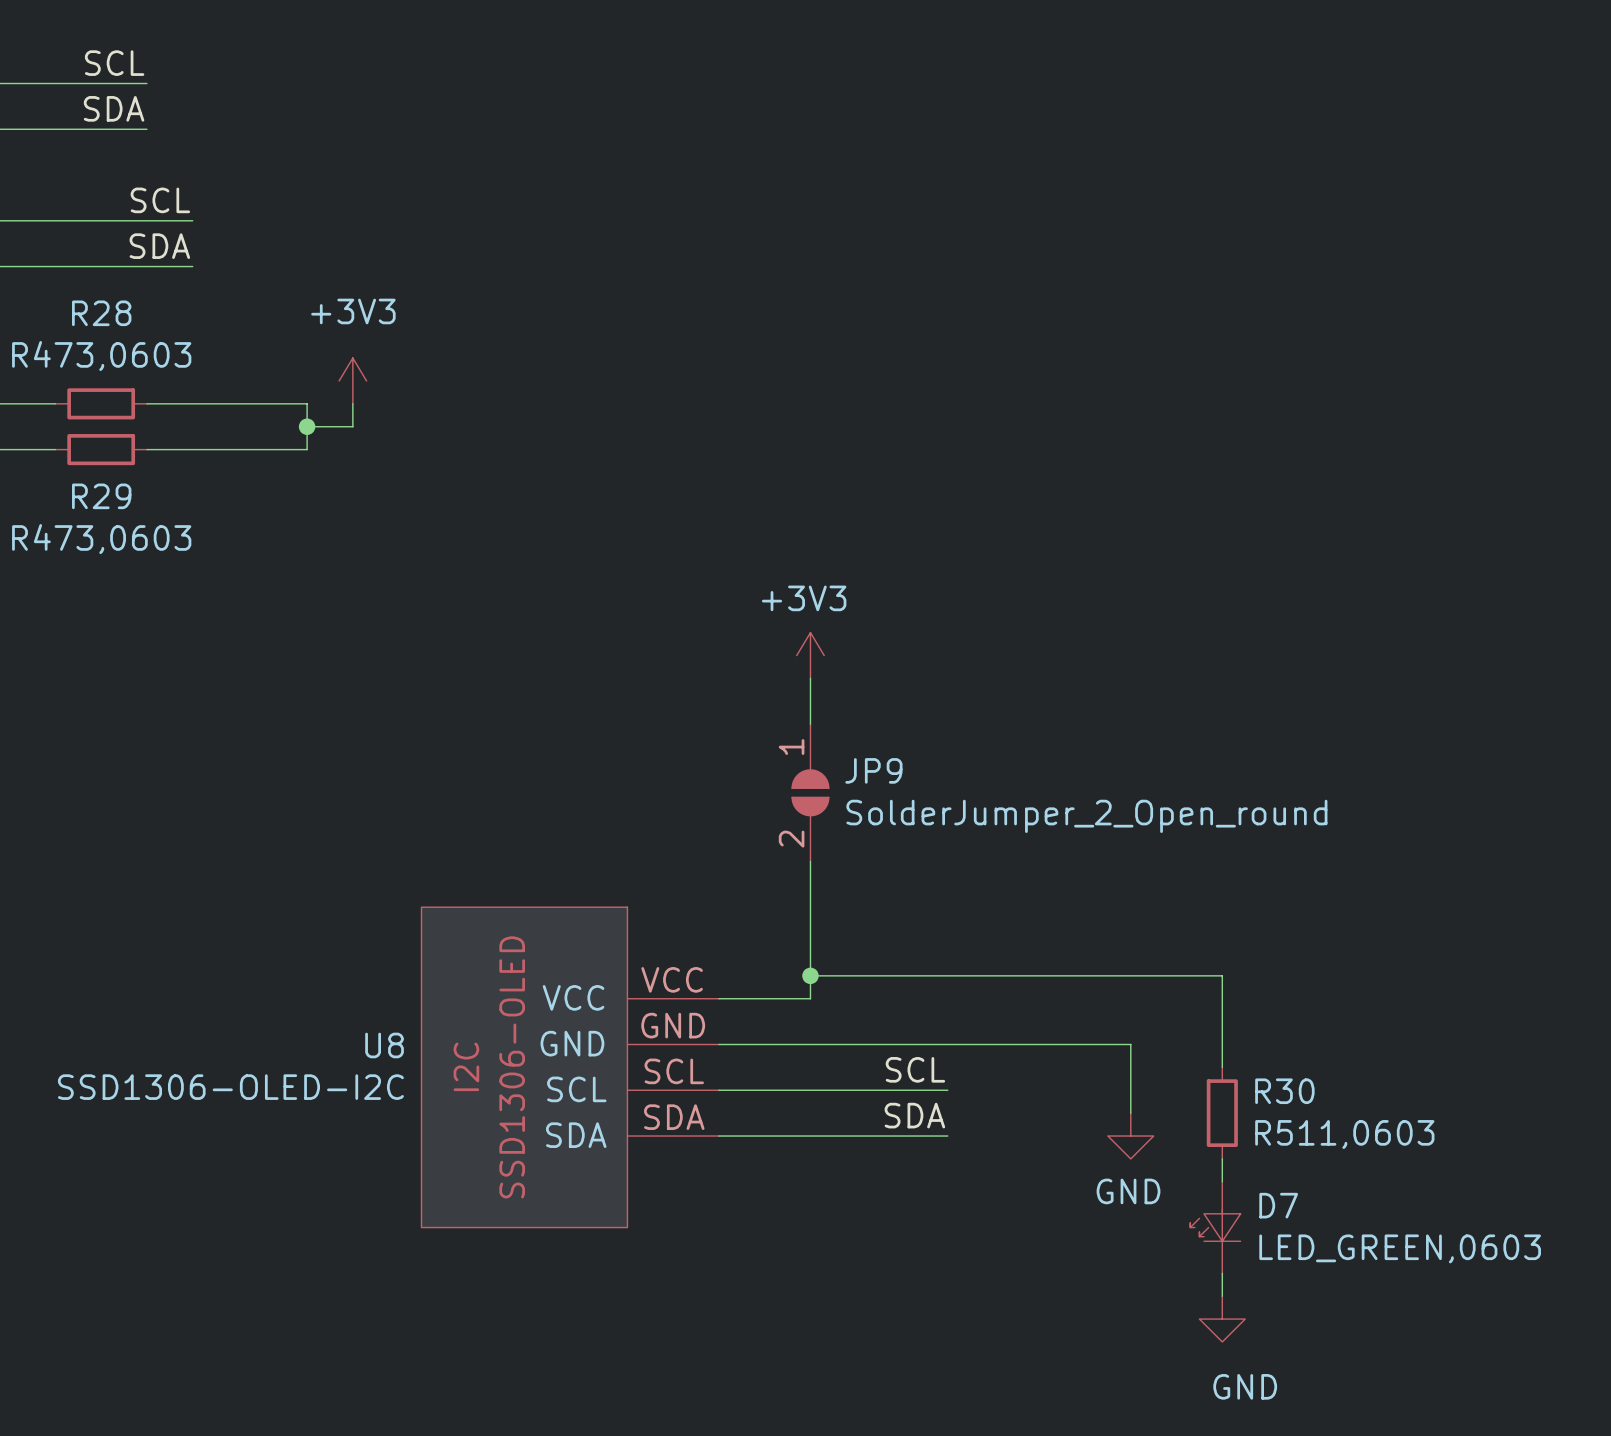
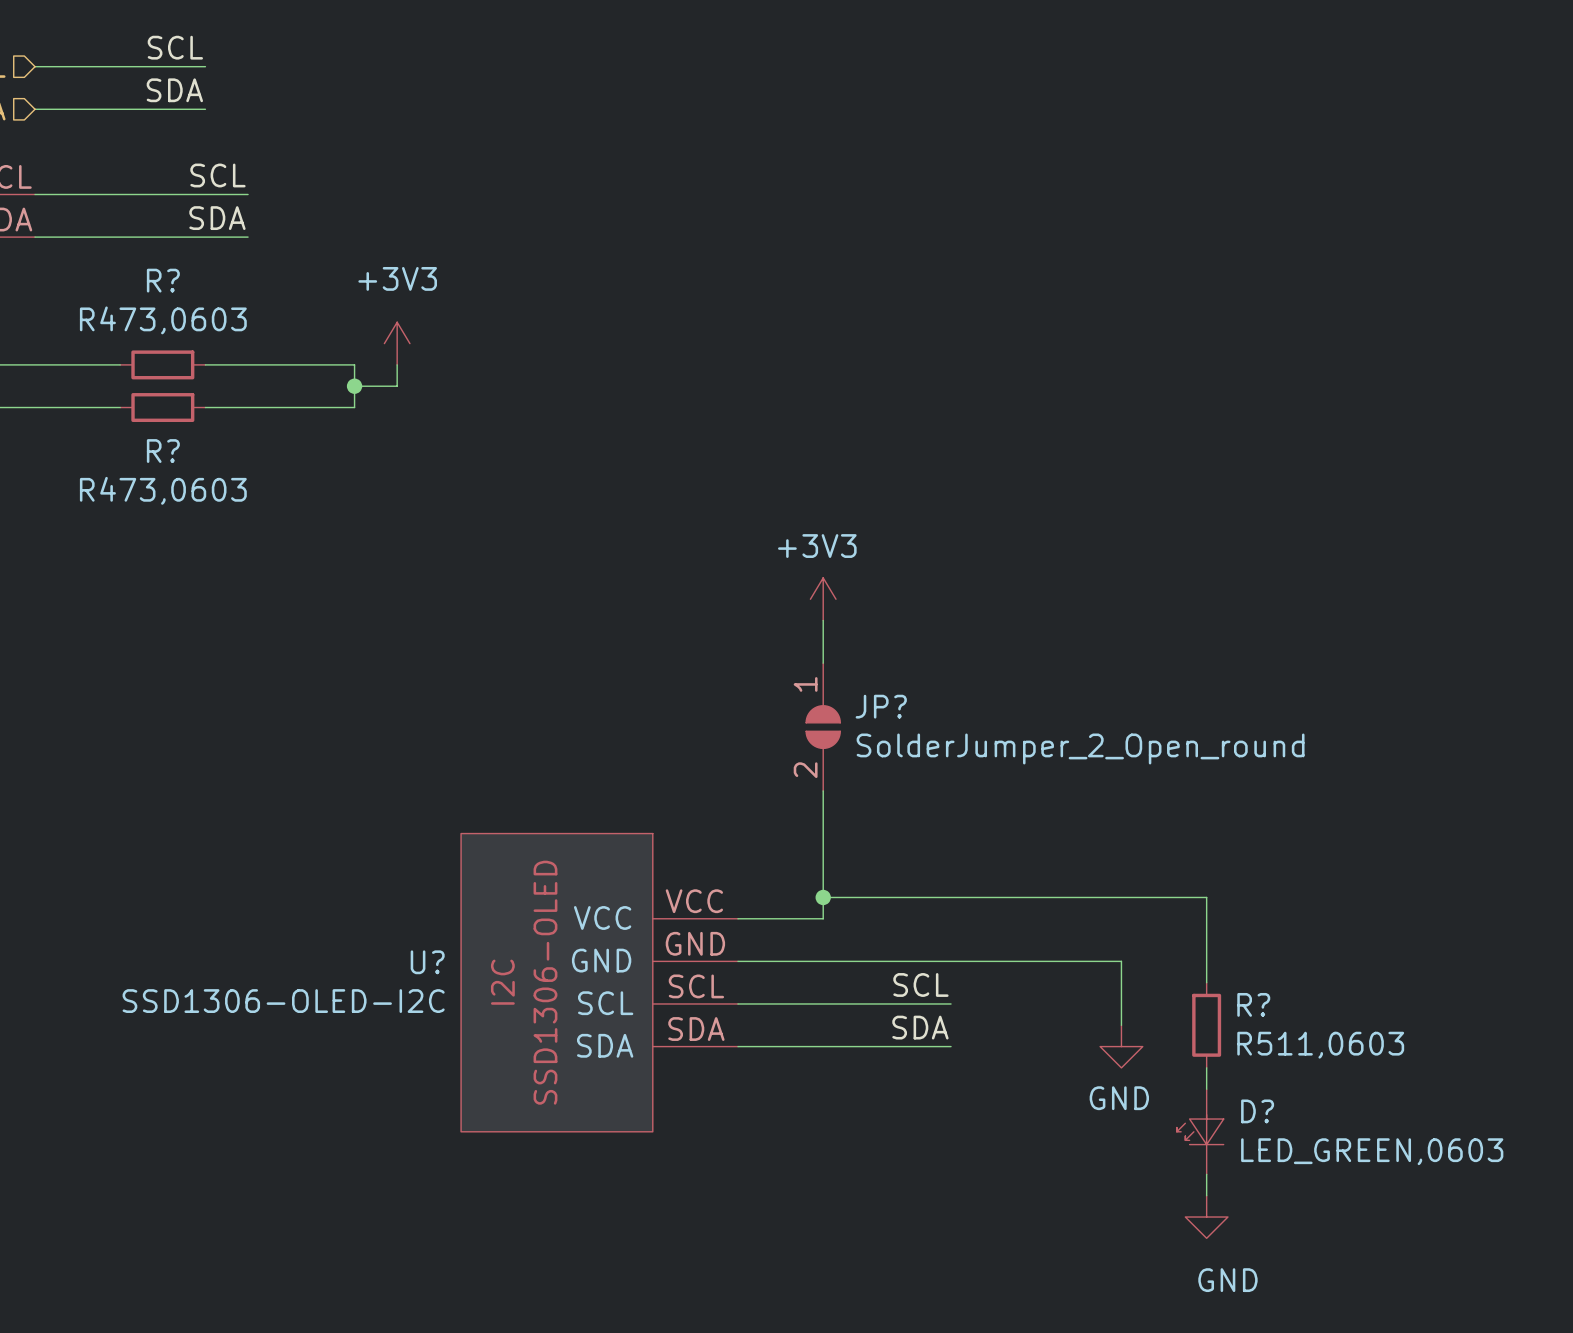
R28 name: R28 (101, 313) -> R? (163, 280)
R29 name: R29 (101, 496) -> R? (163, 451)
JP9 name: JP9 (873, 770) -> JP? (881, 706)
U8 name: U8 (384, 1045) -> U? (427, 962)
R30 name: R30 (1284, 1091) -> R? (1253, 1004)
D7 name: D7 (1278, 1205) -> D? (1257, 1111)

